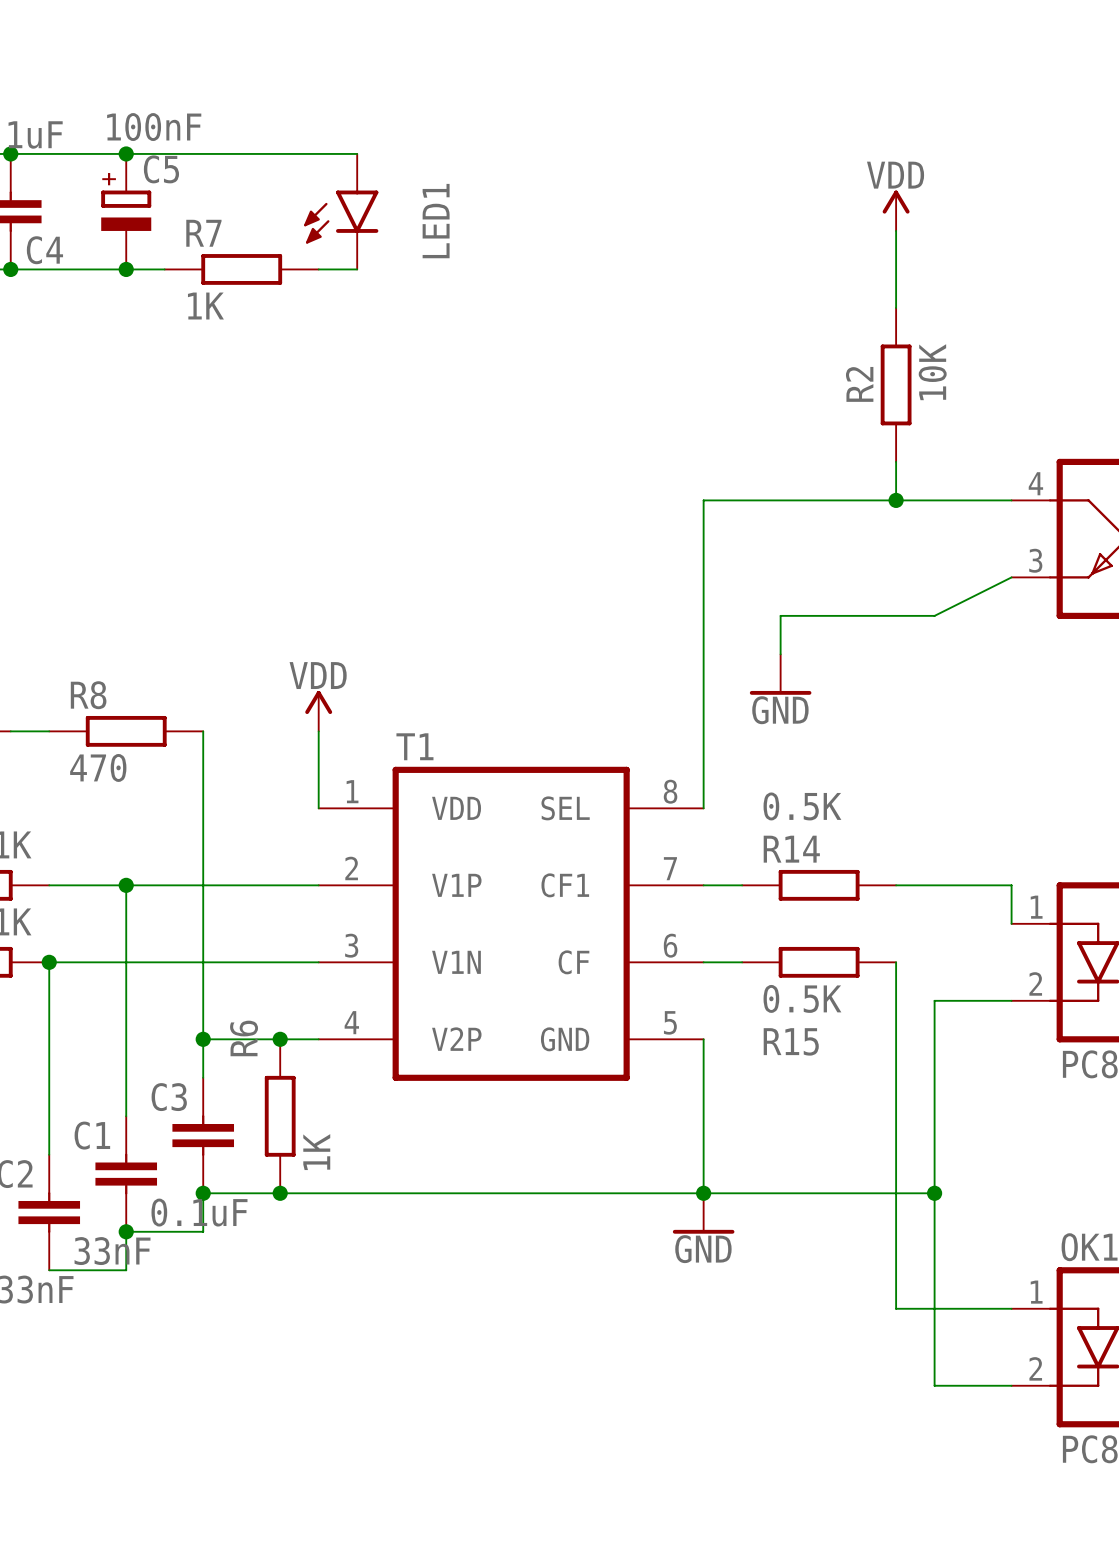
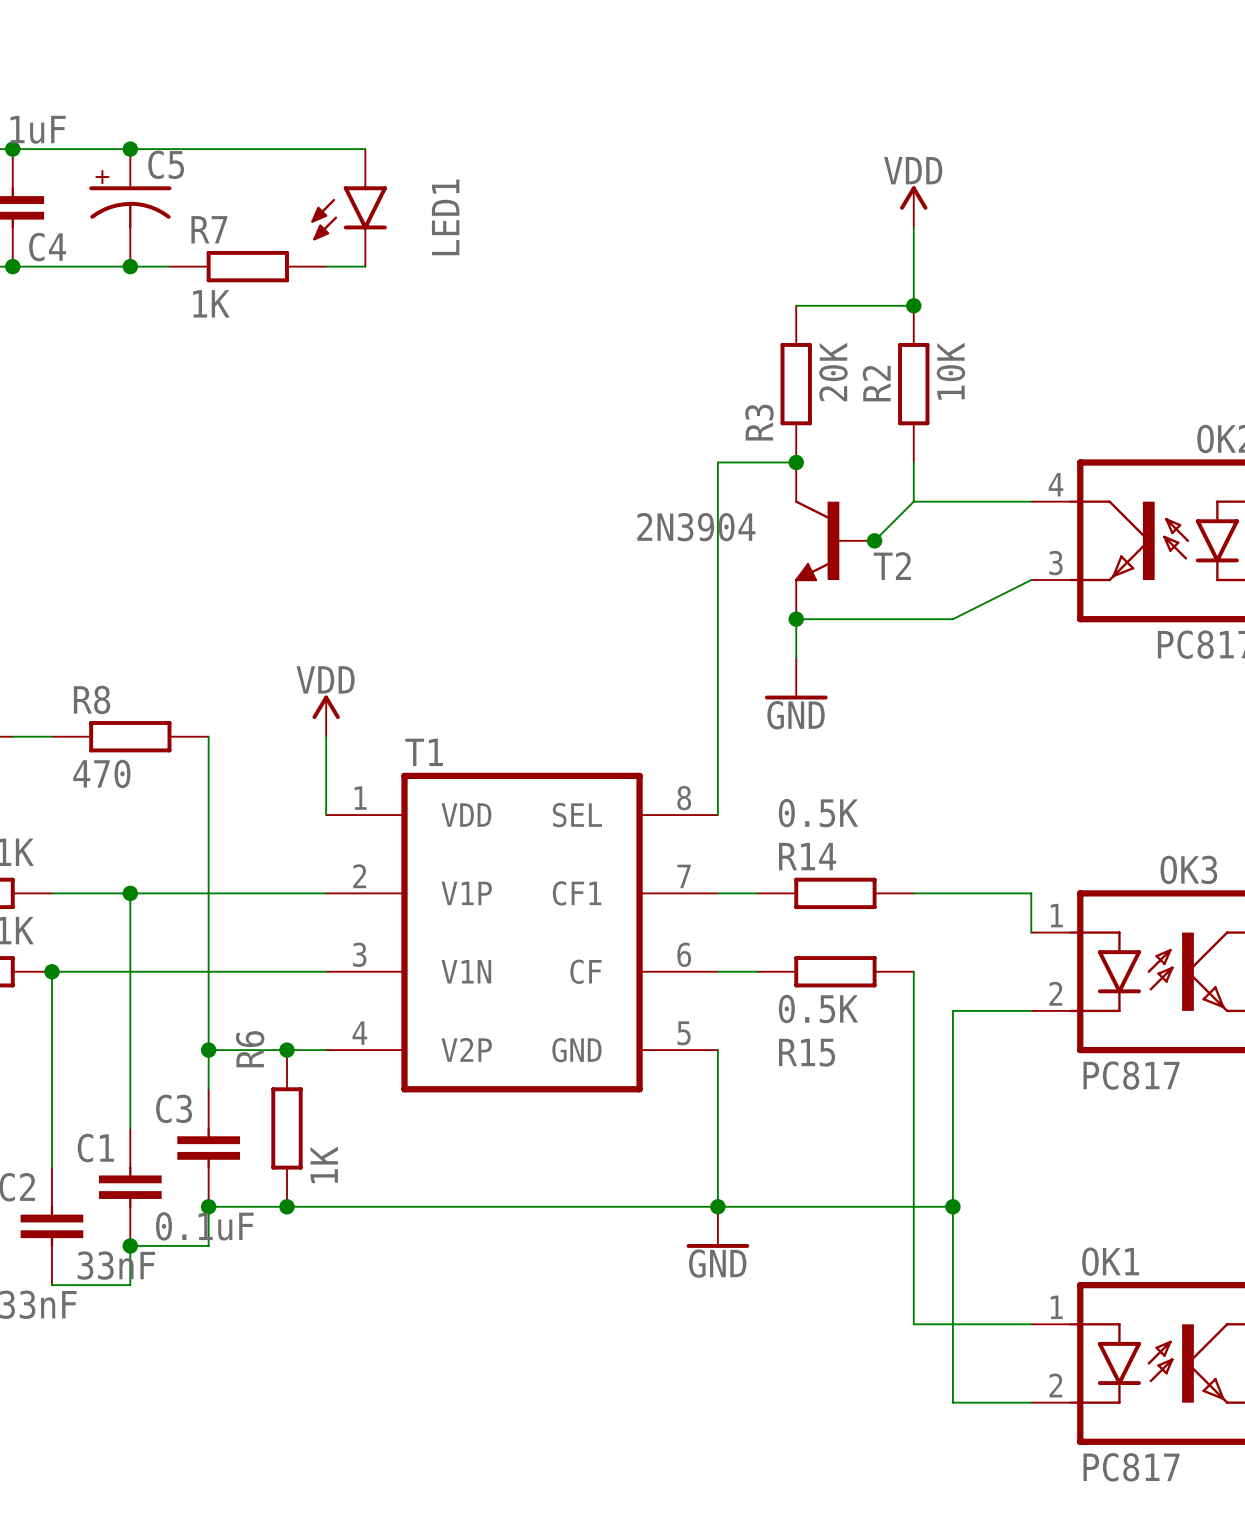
C5 value: 100nF (154, 127) -> none
C5 symbol: [101, 153, 152, 270] -> [89, 149, 172, 267]
wire: none -> (796, 305) (913, 305)
junction: none -> (913, 305)
R3: none -> 20K (796, 384)
junction: none -> (796, 462)
wire: (703, 500) (896, 500) -> (717, 501) (717, 462) (796, 462)
wire: none -> (913, 501) (874, 540)
junction position: (896, 500) -> (874, 540)
T2: none -> 2N3904 (834, 540)
junction: none -> (796, 619)

